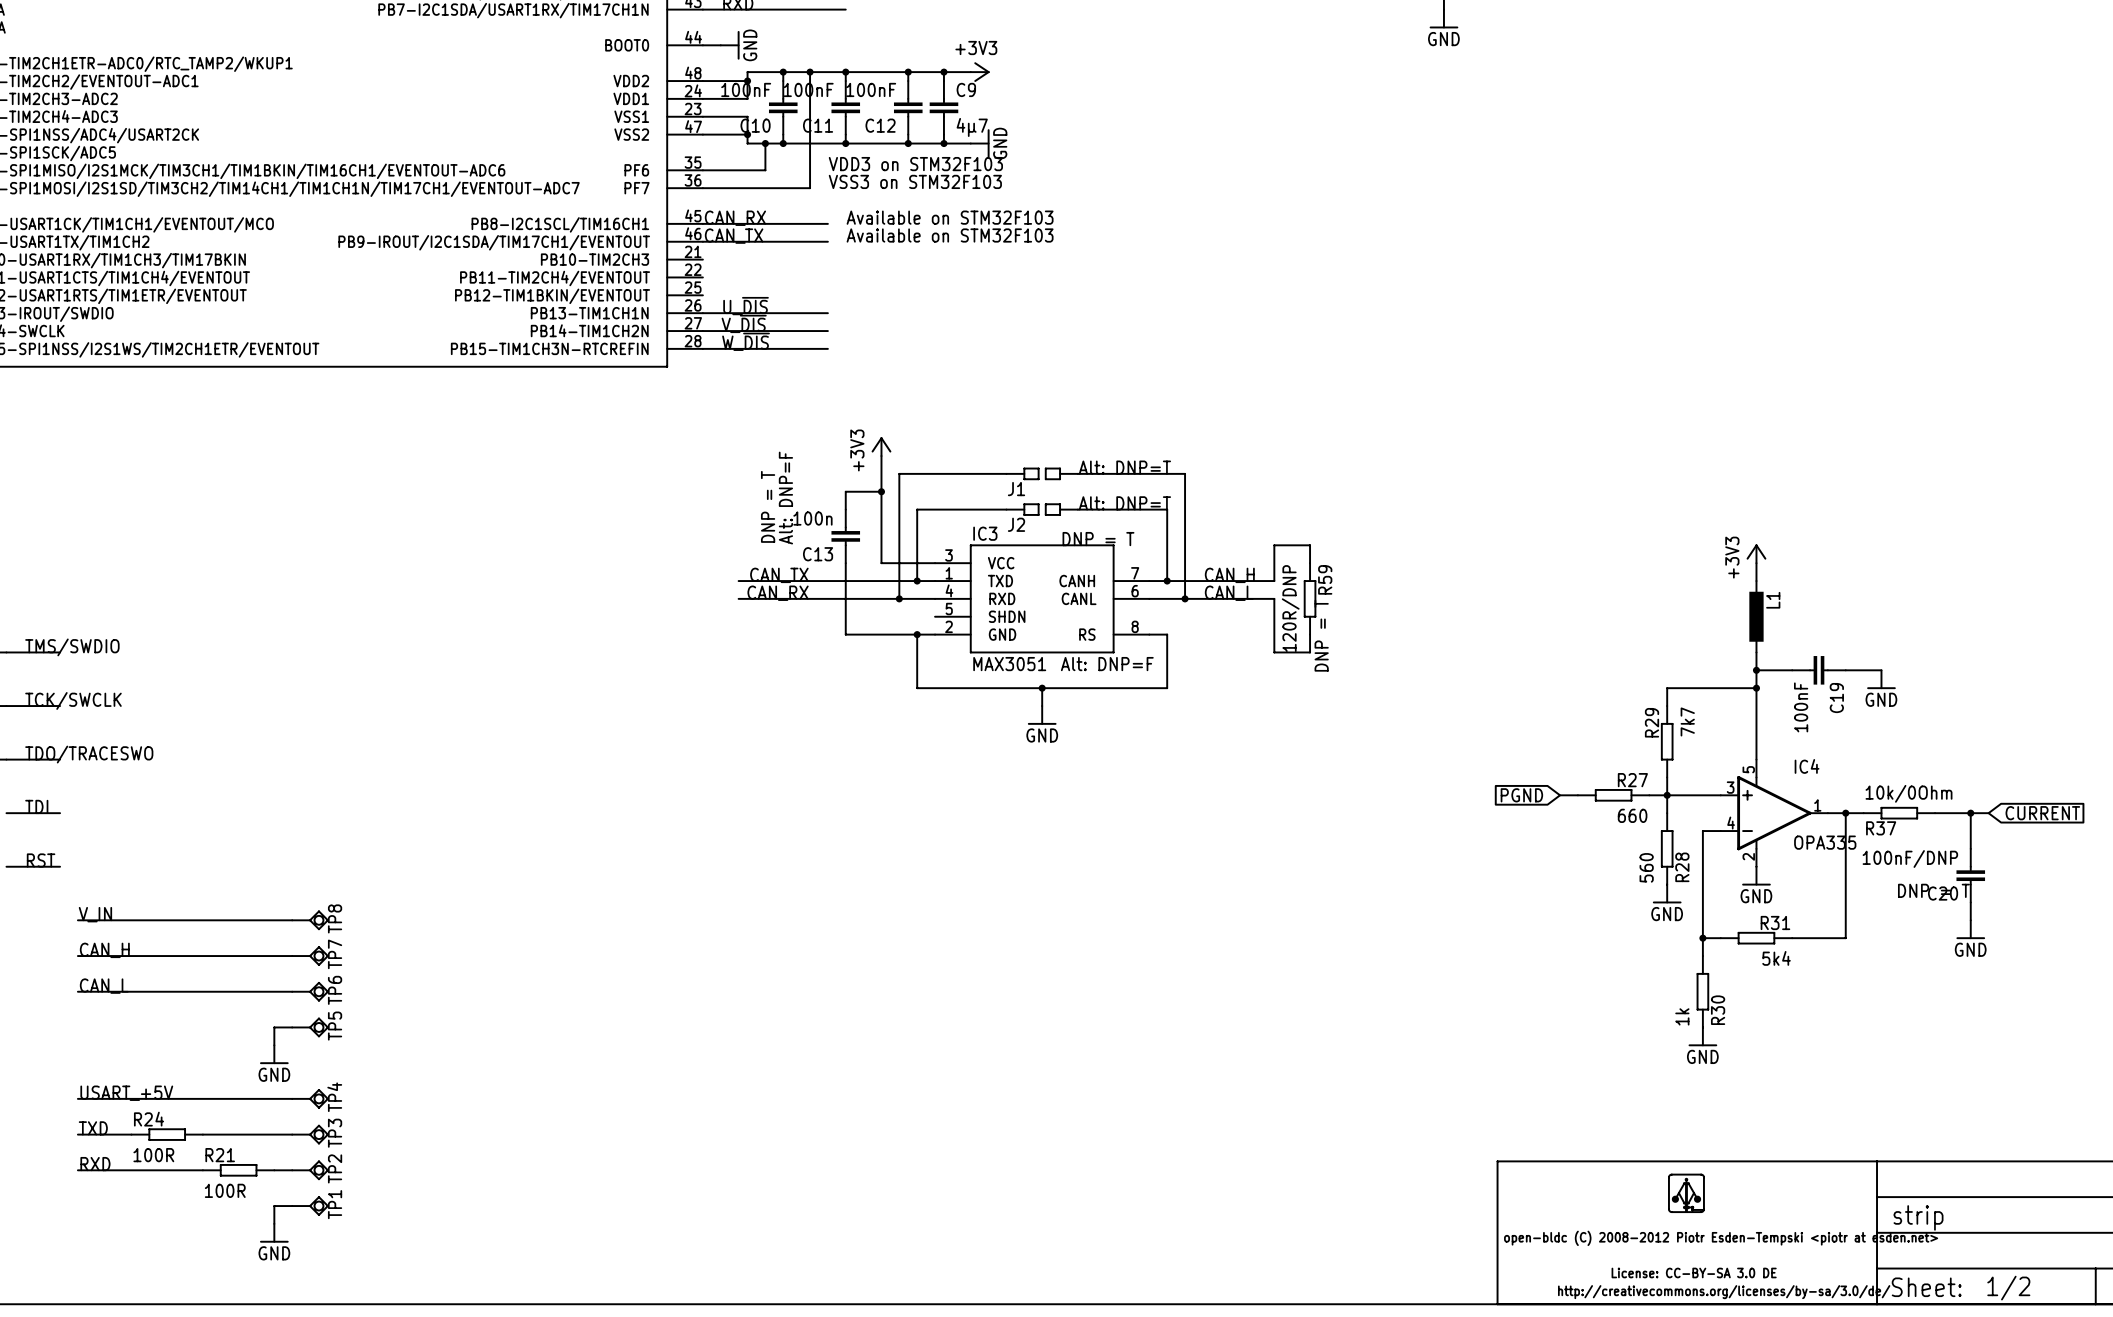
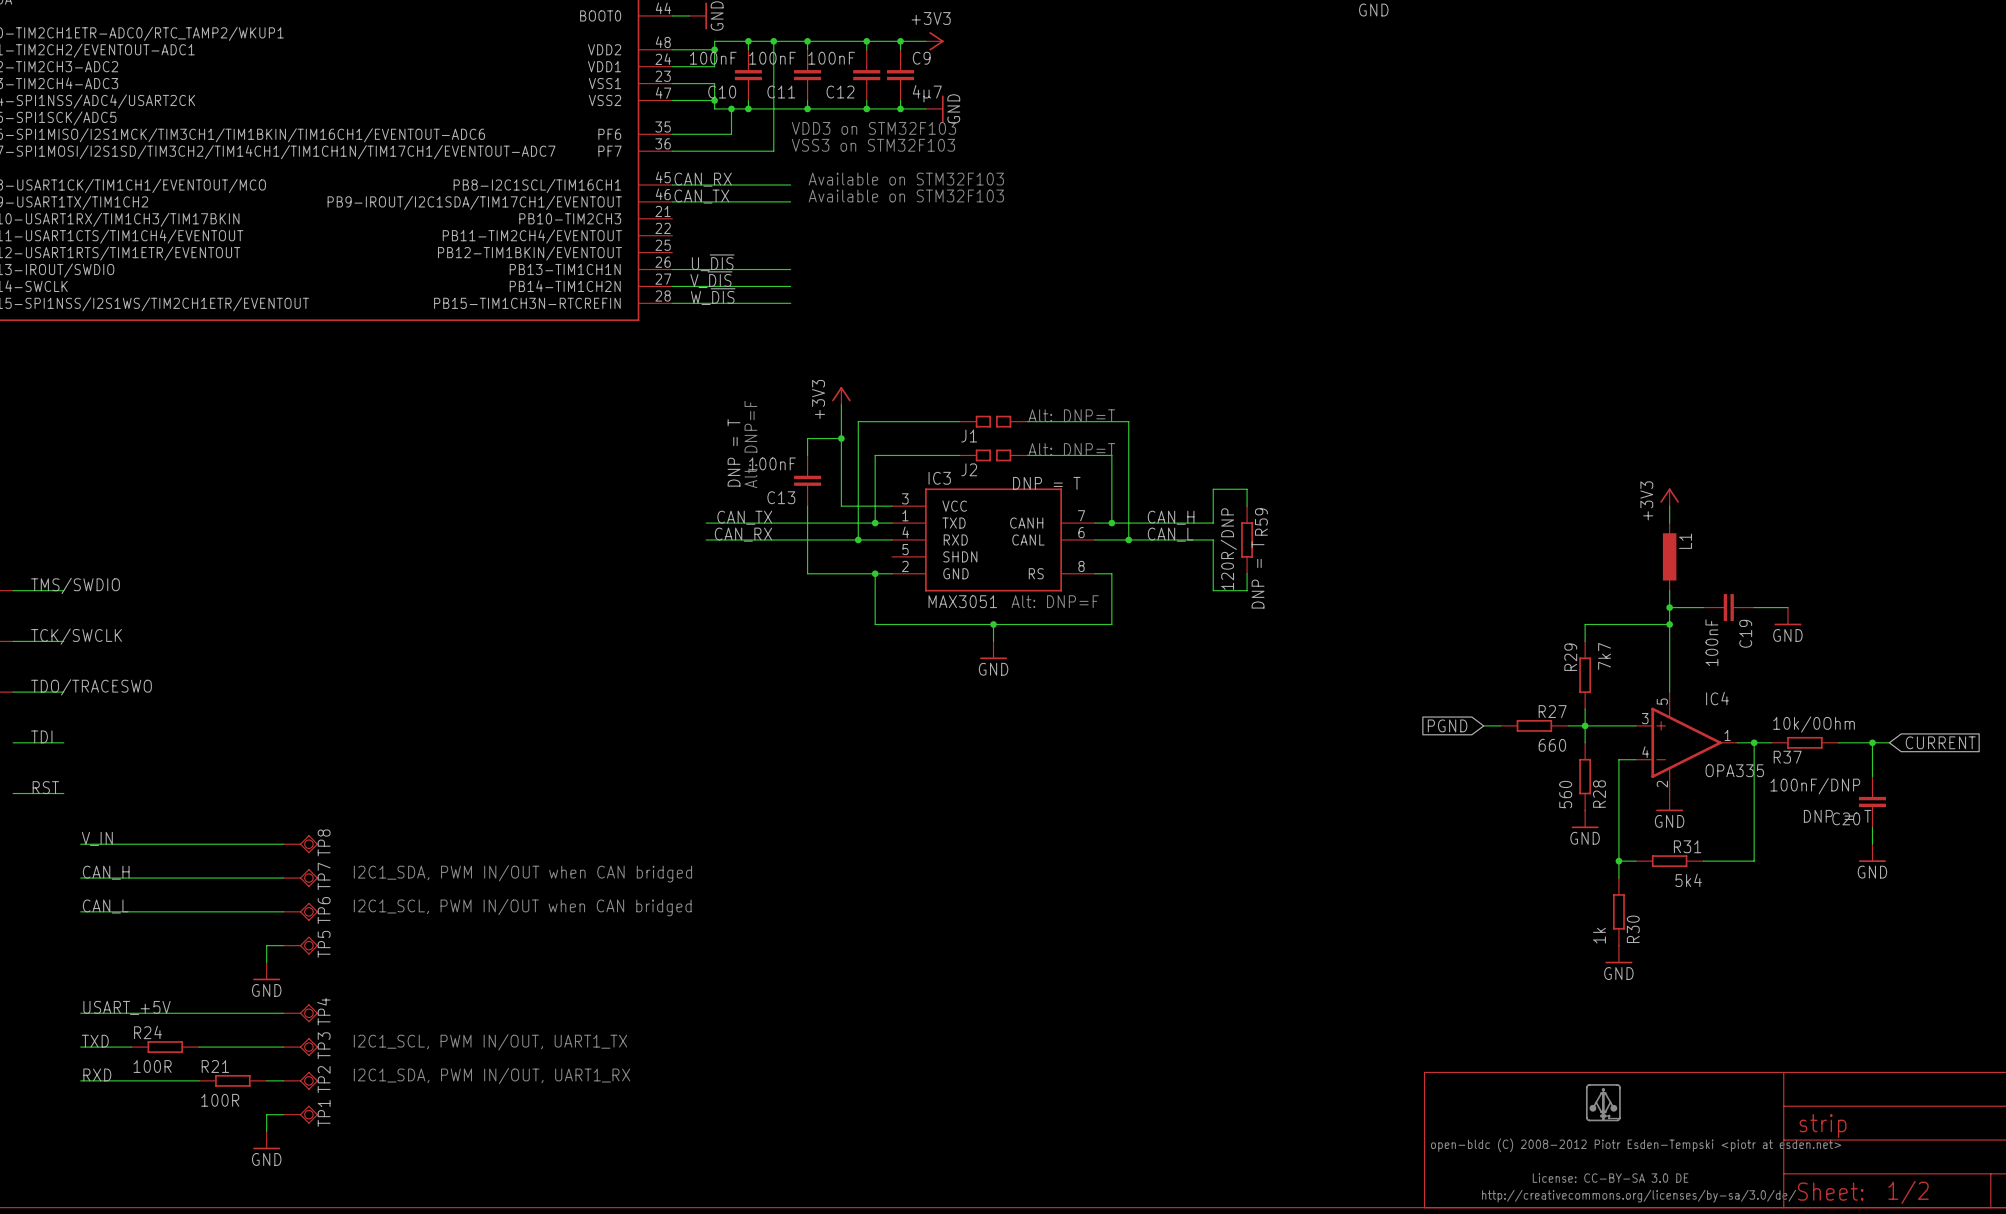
C13 value: 100n (812, 518) -> 100nF (772, 463)
text: none -> I2C1_SDA, PWM IN/OUT when CAN bridged (522, 873)
text: none -> I2C1_SCL, PWM IN/OUT when CAN bridged (522, 907)
text: none -> I2C1_SCL, PWM IN/OUT, UART1_TX (490, 1042)
text: none -> I2C1_SDA, PWM IN/OUT, UART1_RX (492, 1076)

